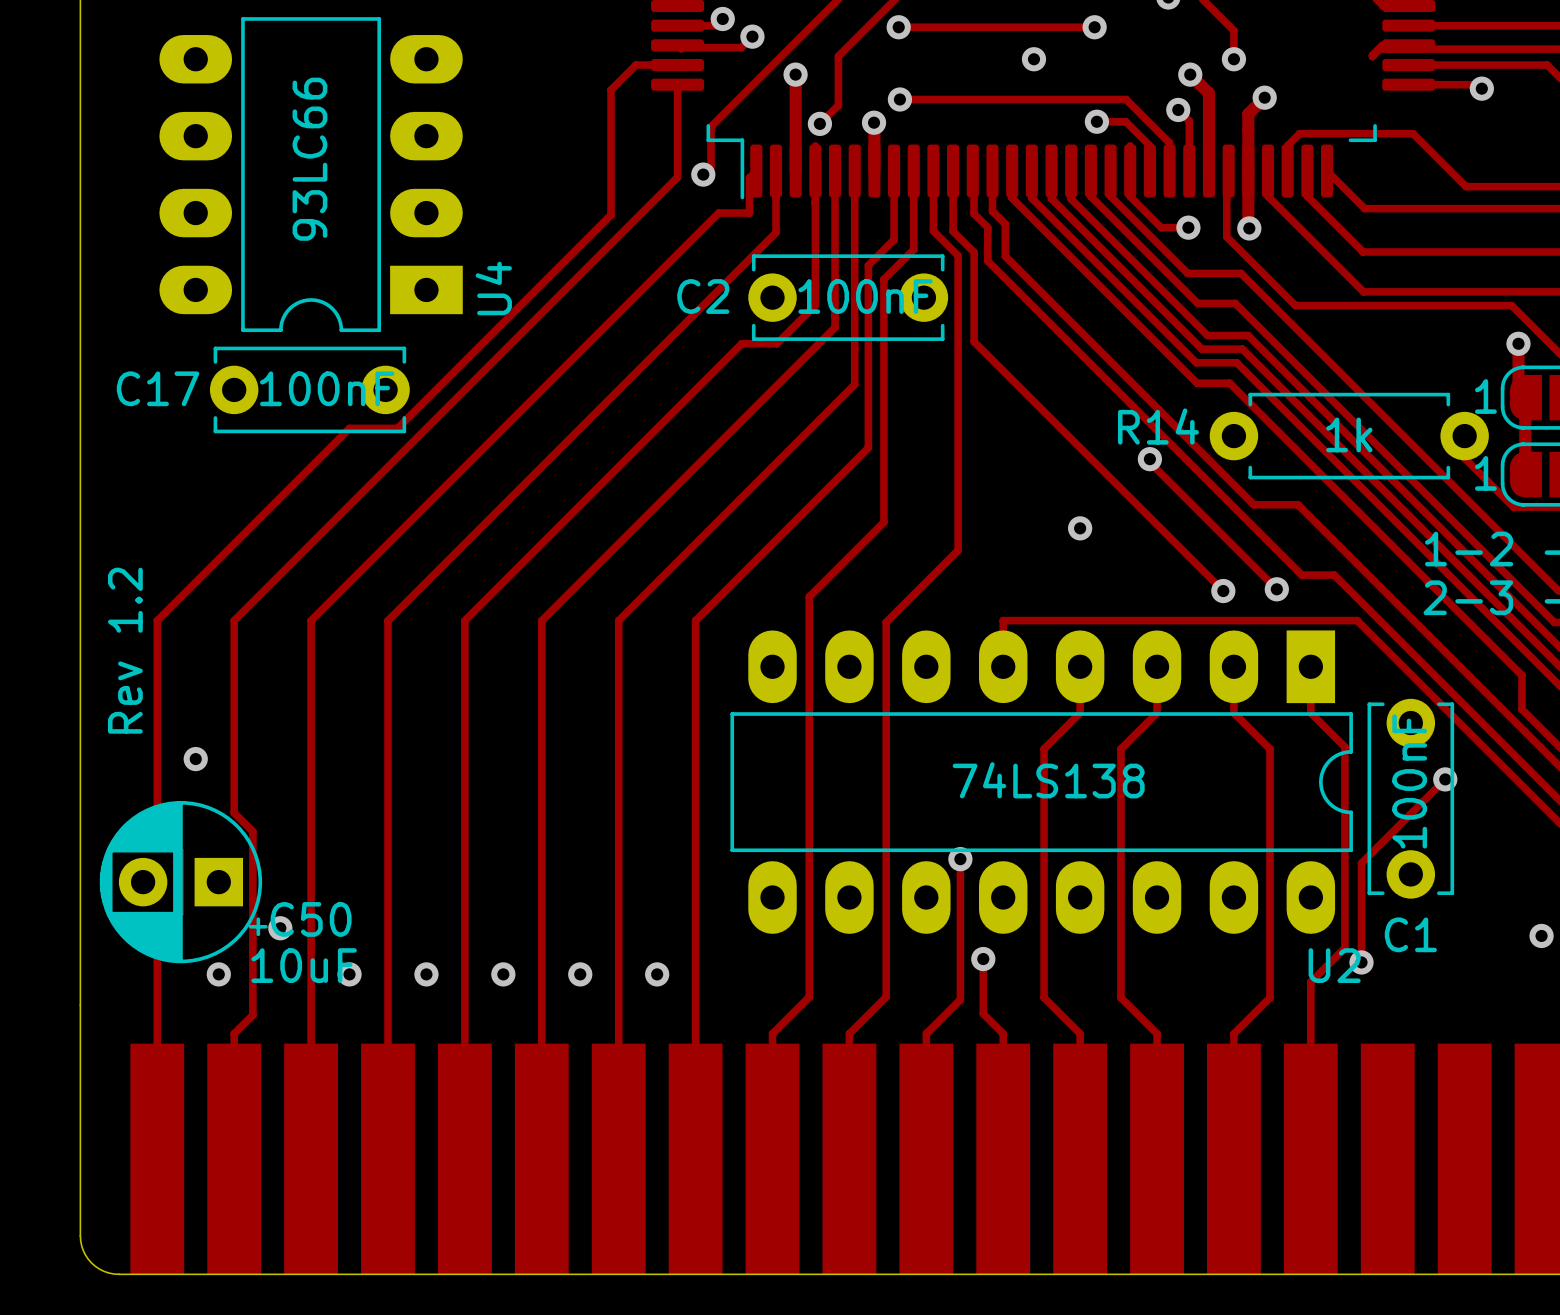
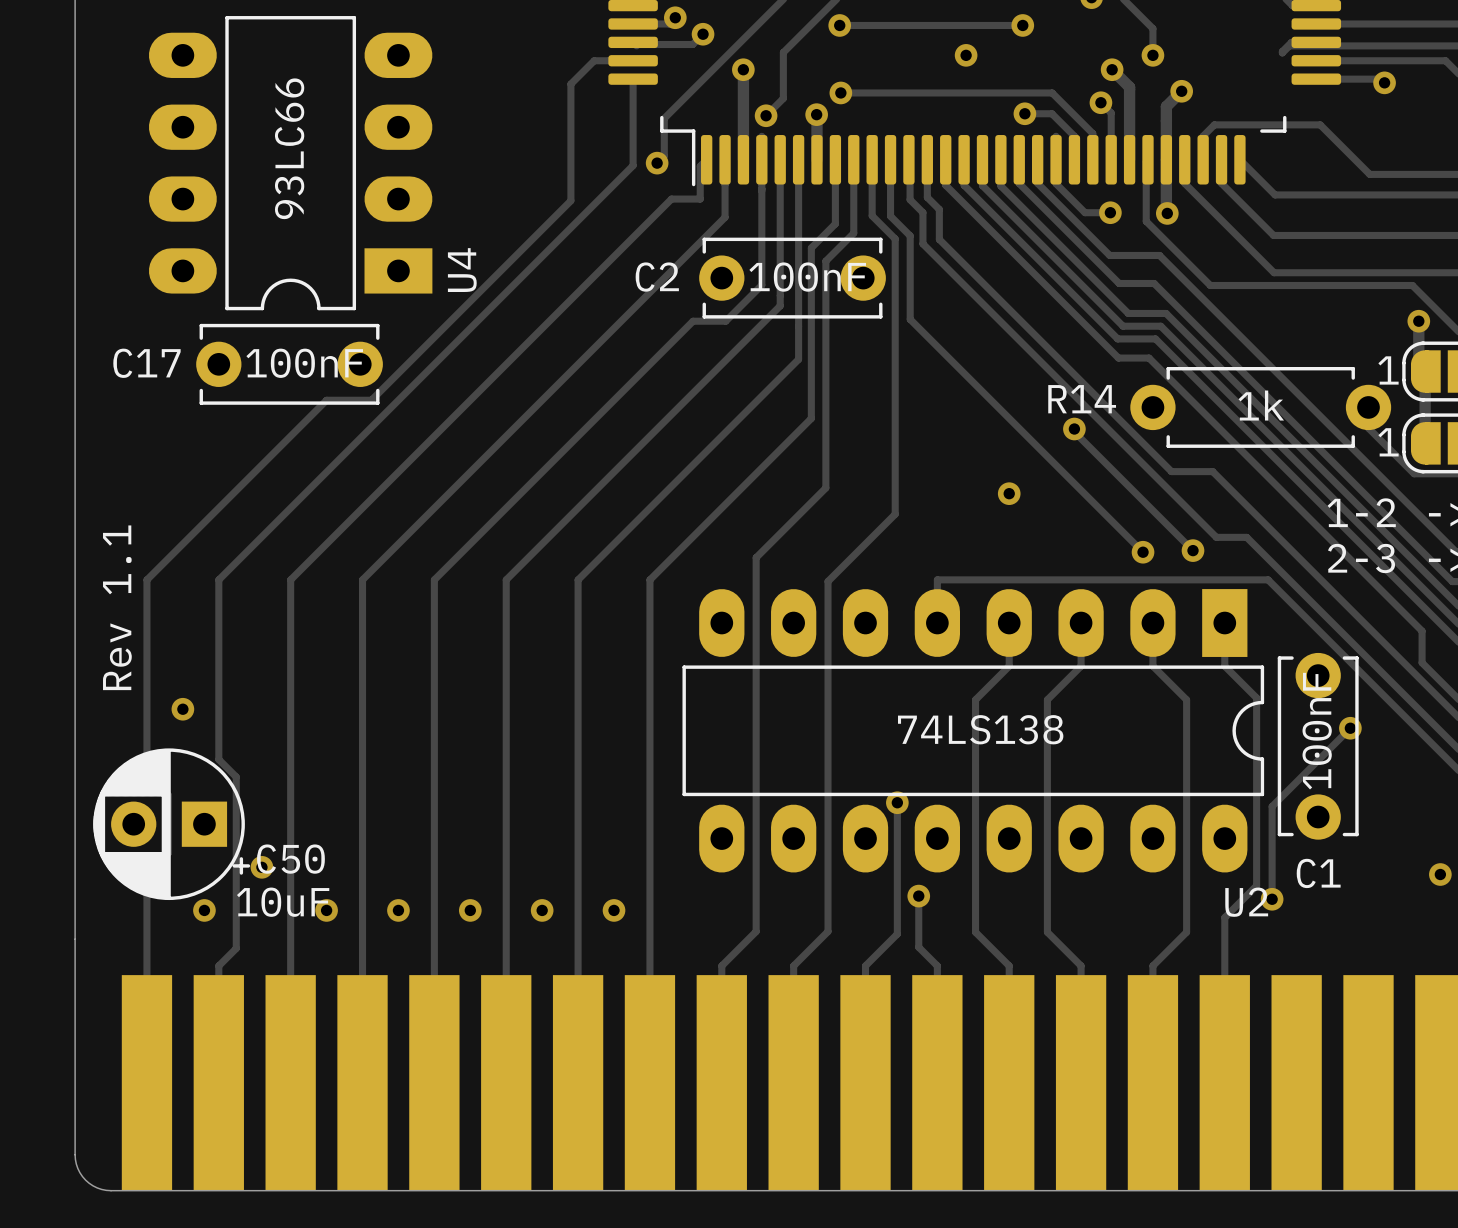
text: Rev 1.2 (125, 650) -> Rev 1.1 (117, 607)

